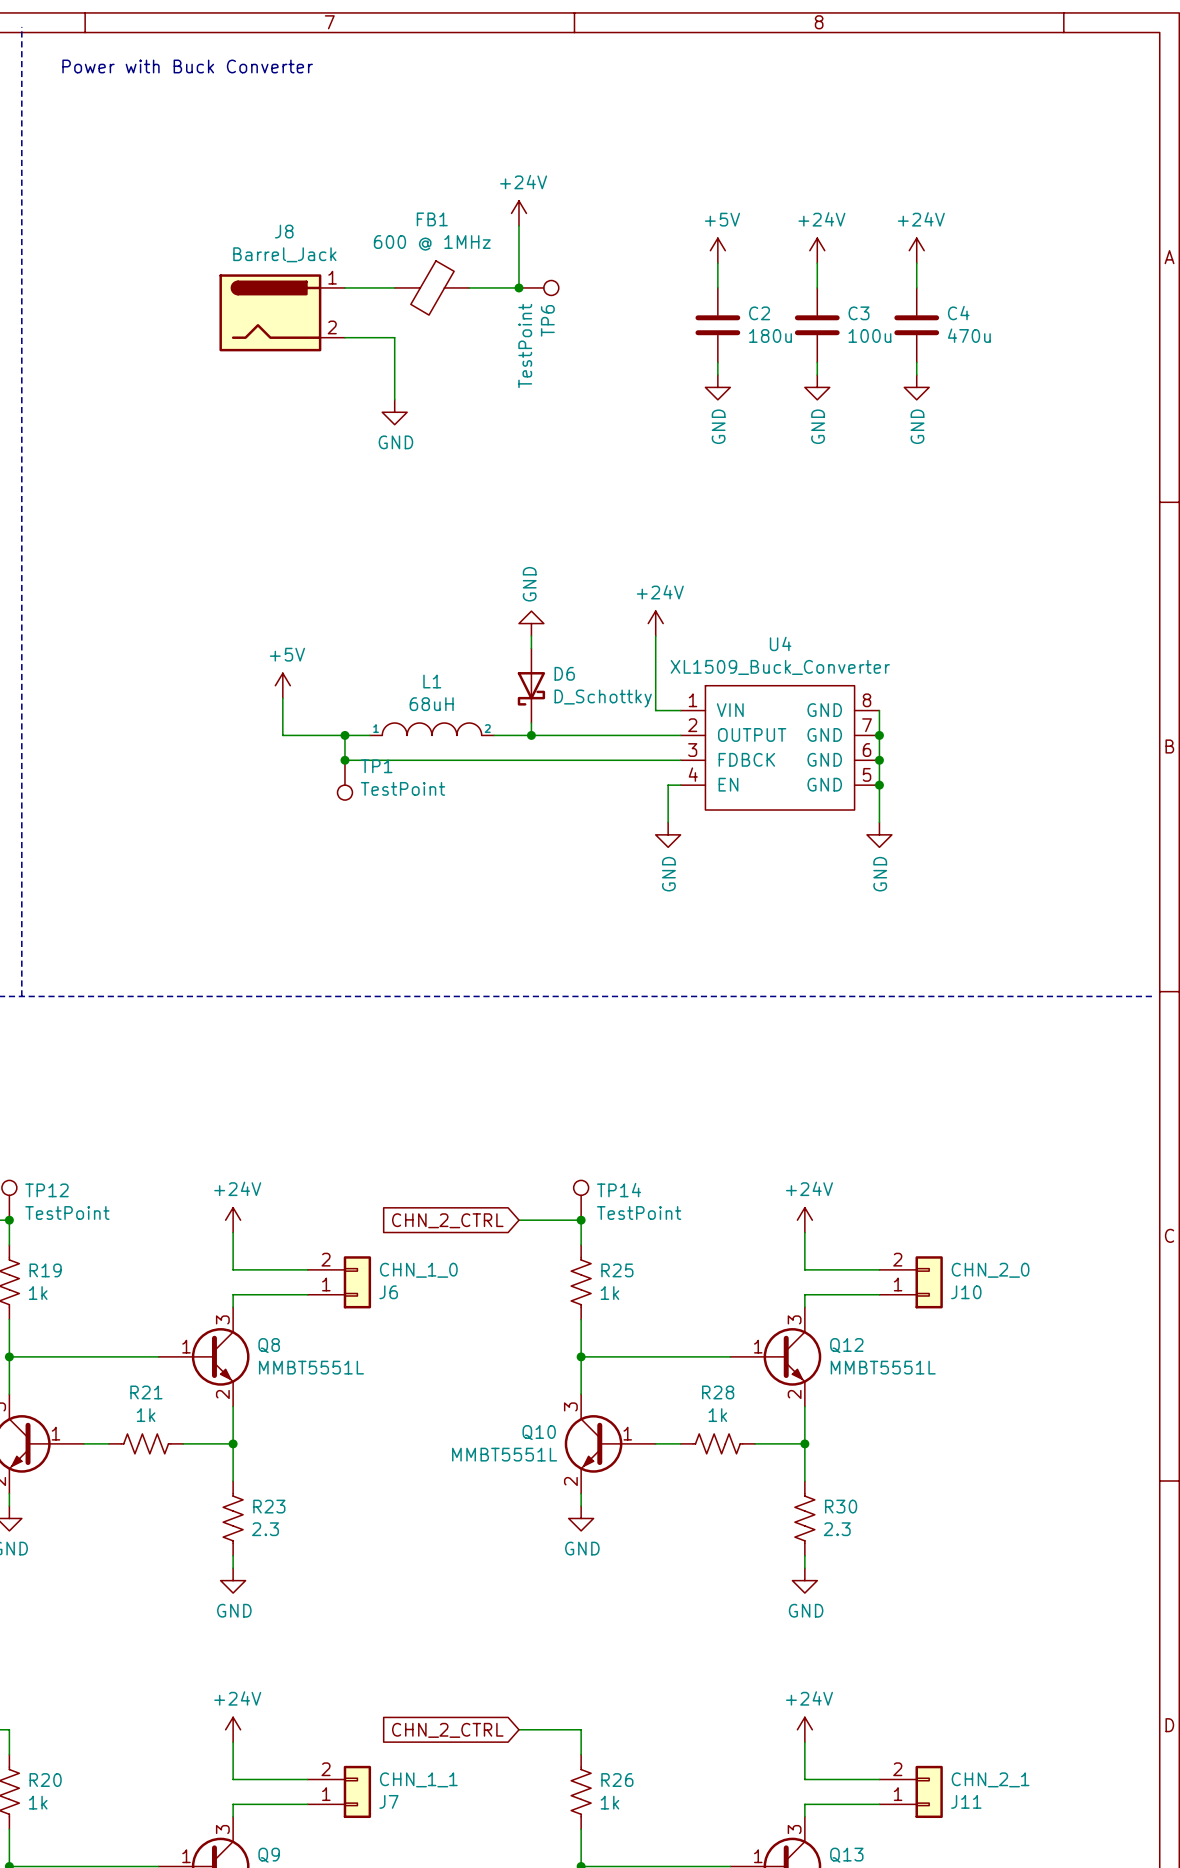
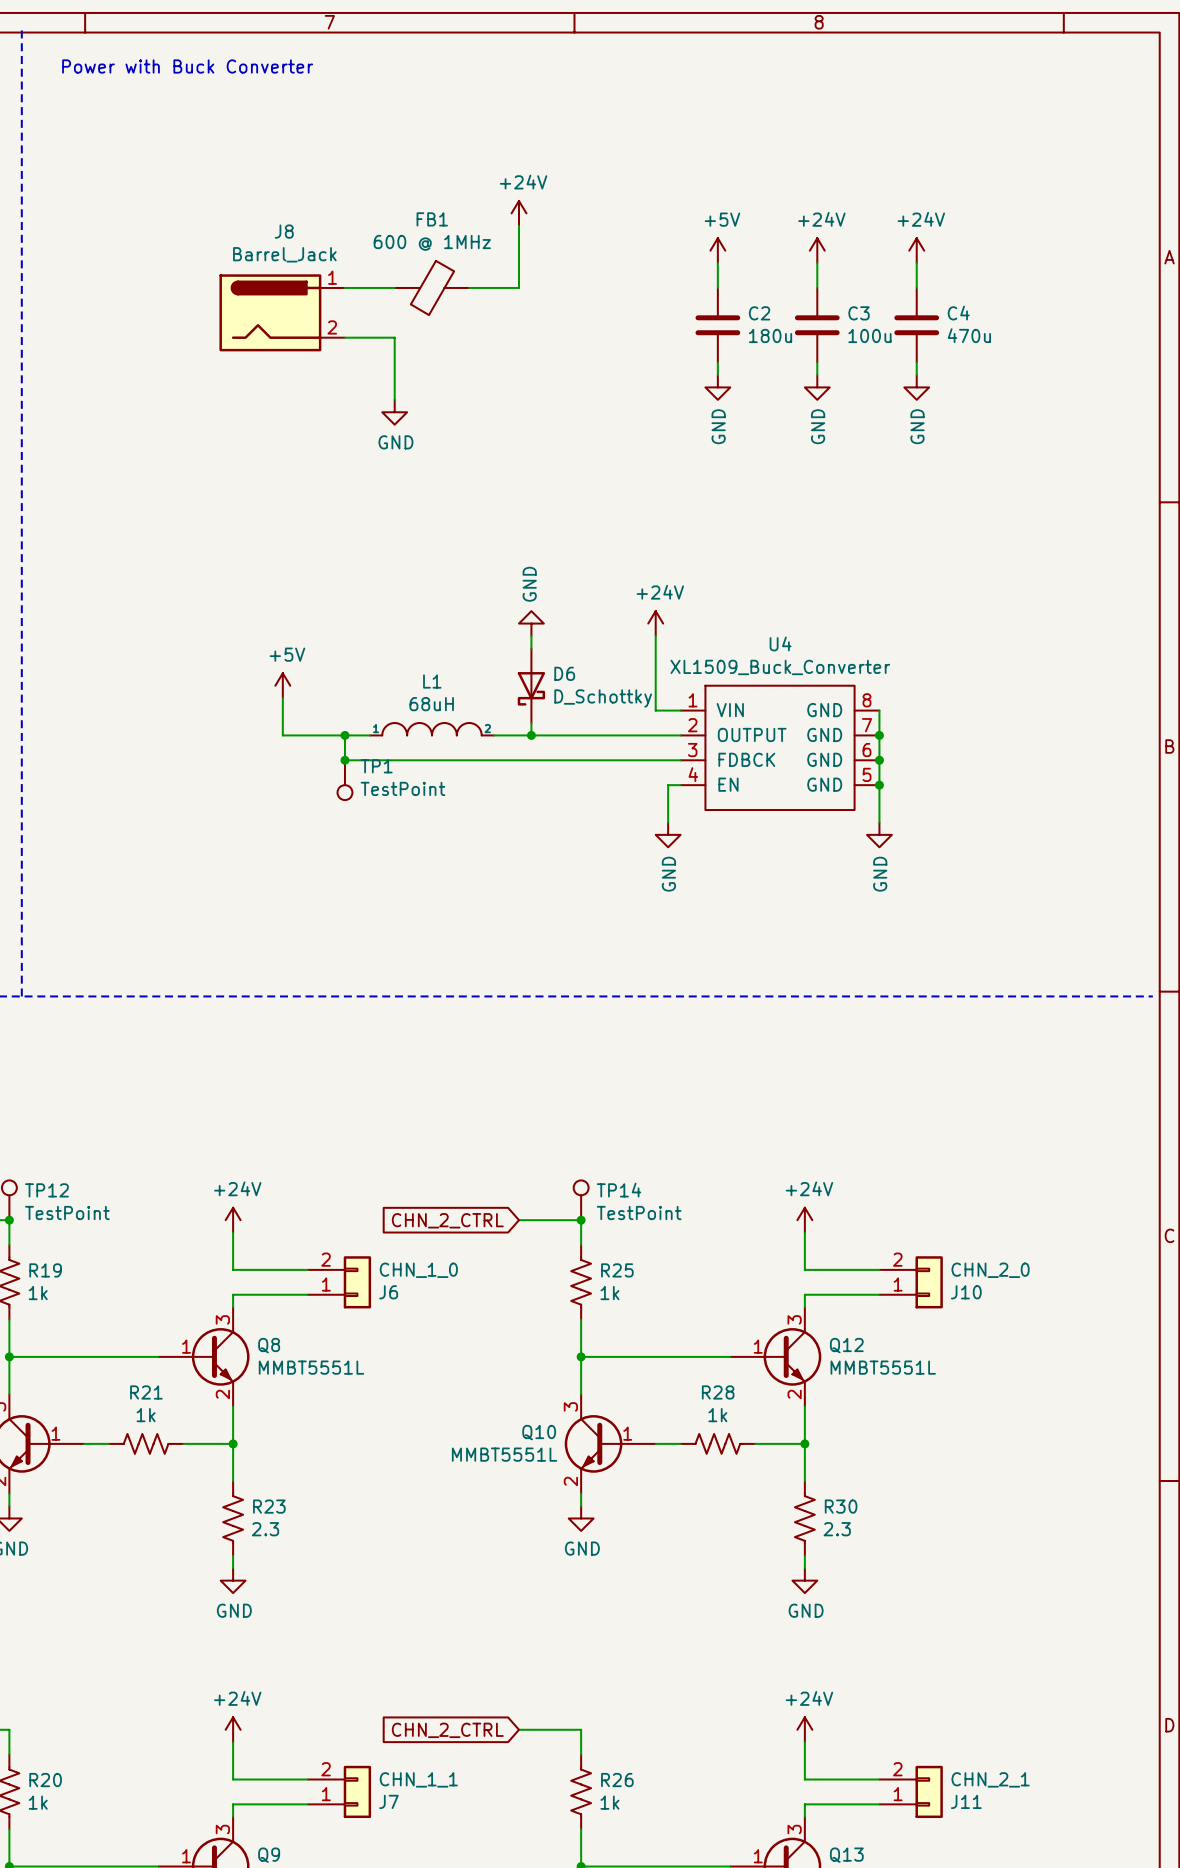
junction: (518, 287) -> none
TP6: TestPoint (538, 287) -> none

